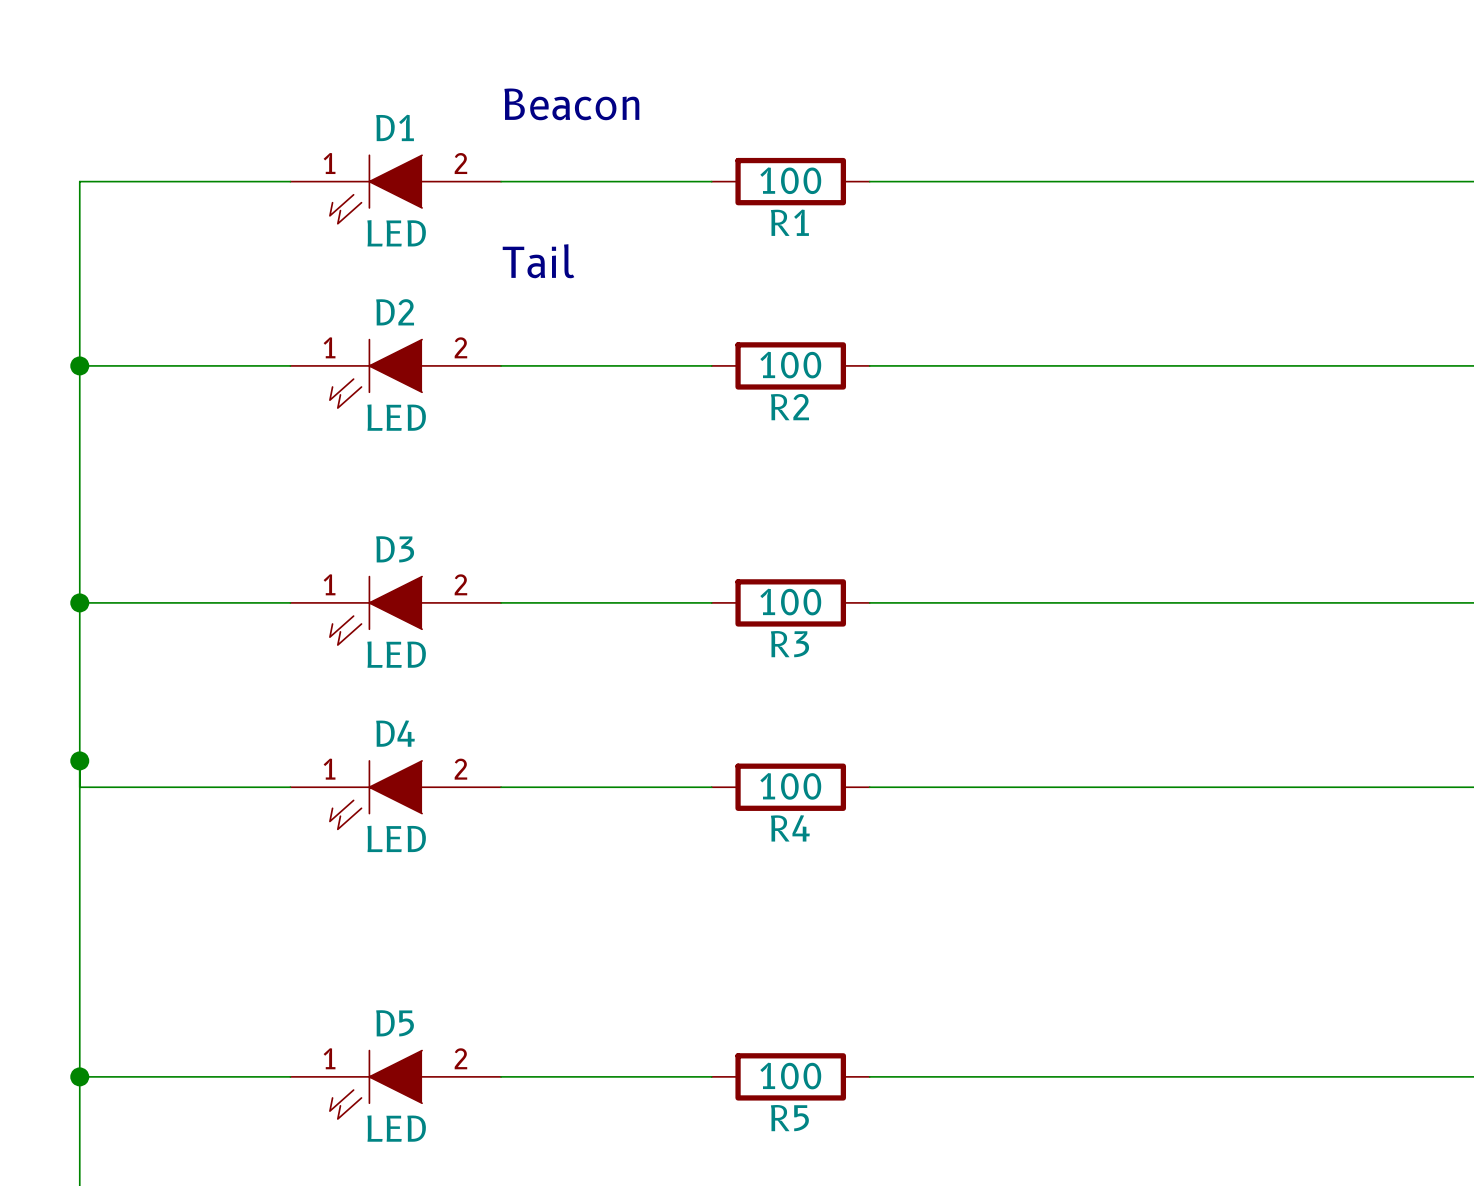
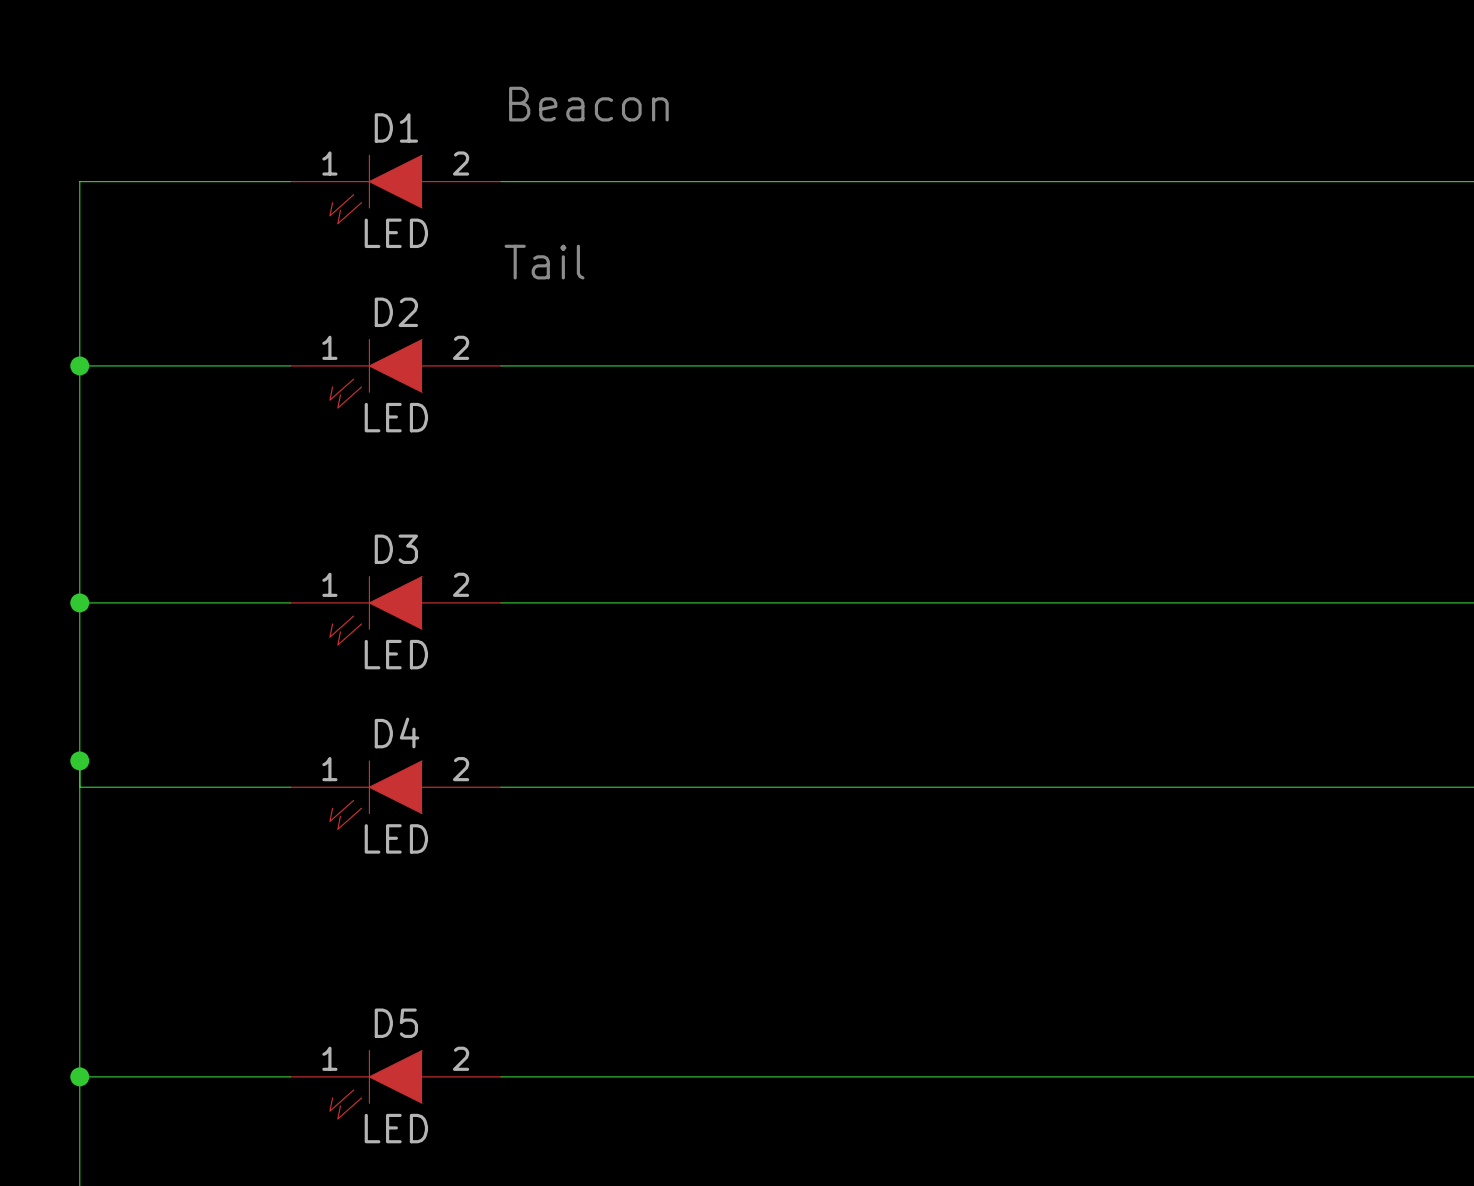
wire: none -> (711, 181) (869, 181)
R1: 100 (790, 181) -> none
wire: none -> (711, 365) (869, 365)
R2: 100 (790, 365) -> none
wire: none -> (711, 602) (869, 602)
R3: 100 (790, 602) -> none
wire: none -> (711, 787) (869, 787)
R4: 100 (790, 787) -> none
wire: none -> (711, 1076) (869, 1076)
R5: 100 (790, 1076) -> none

